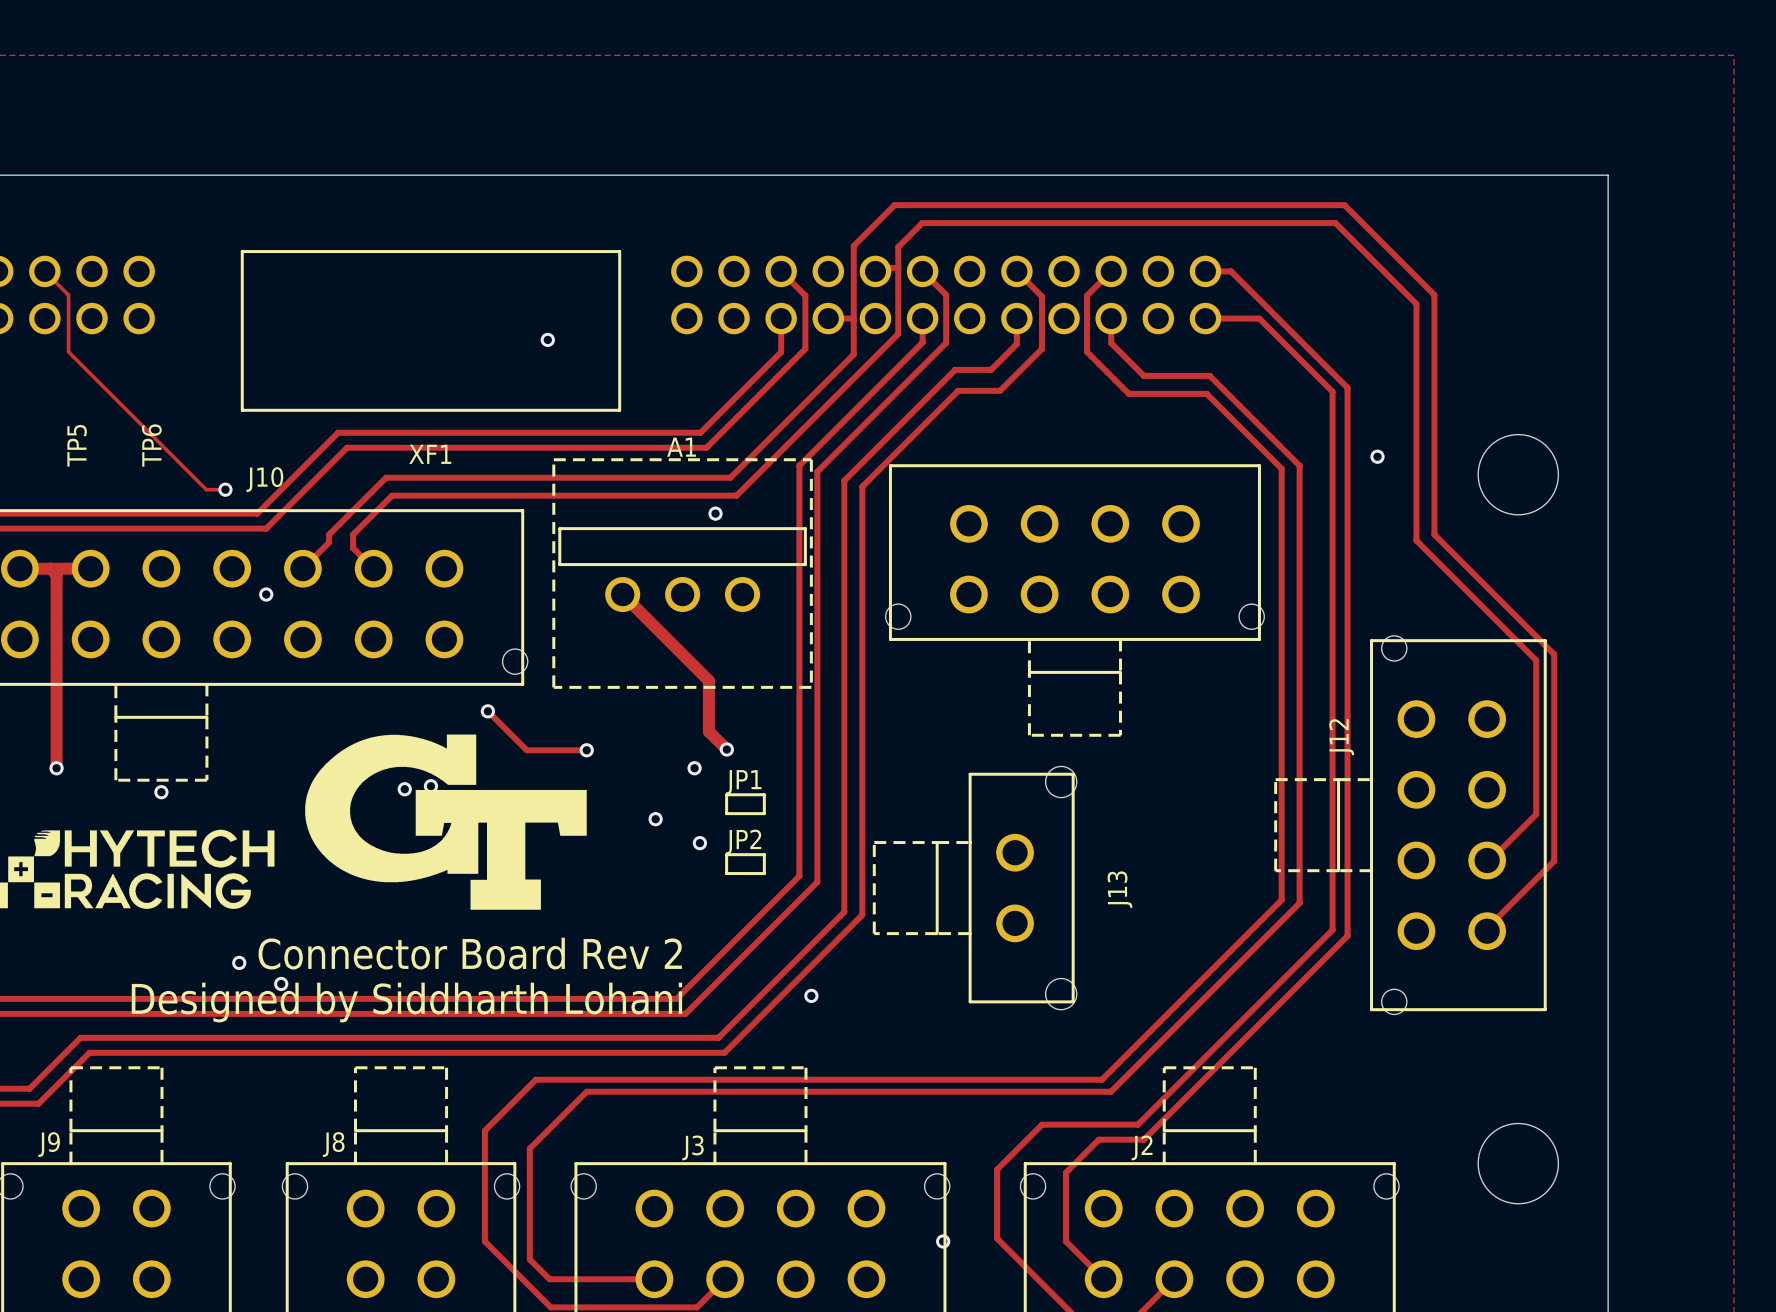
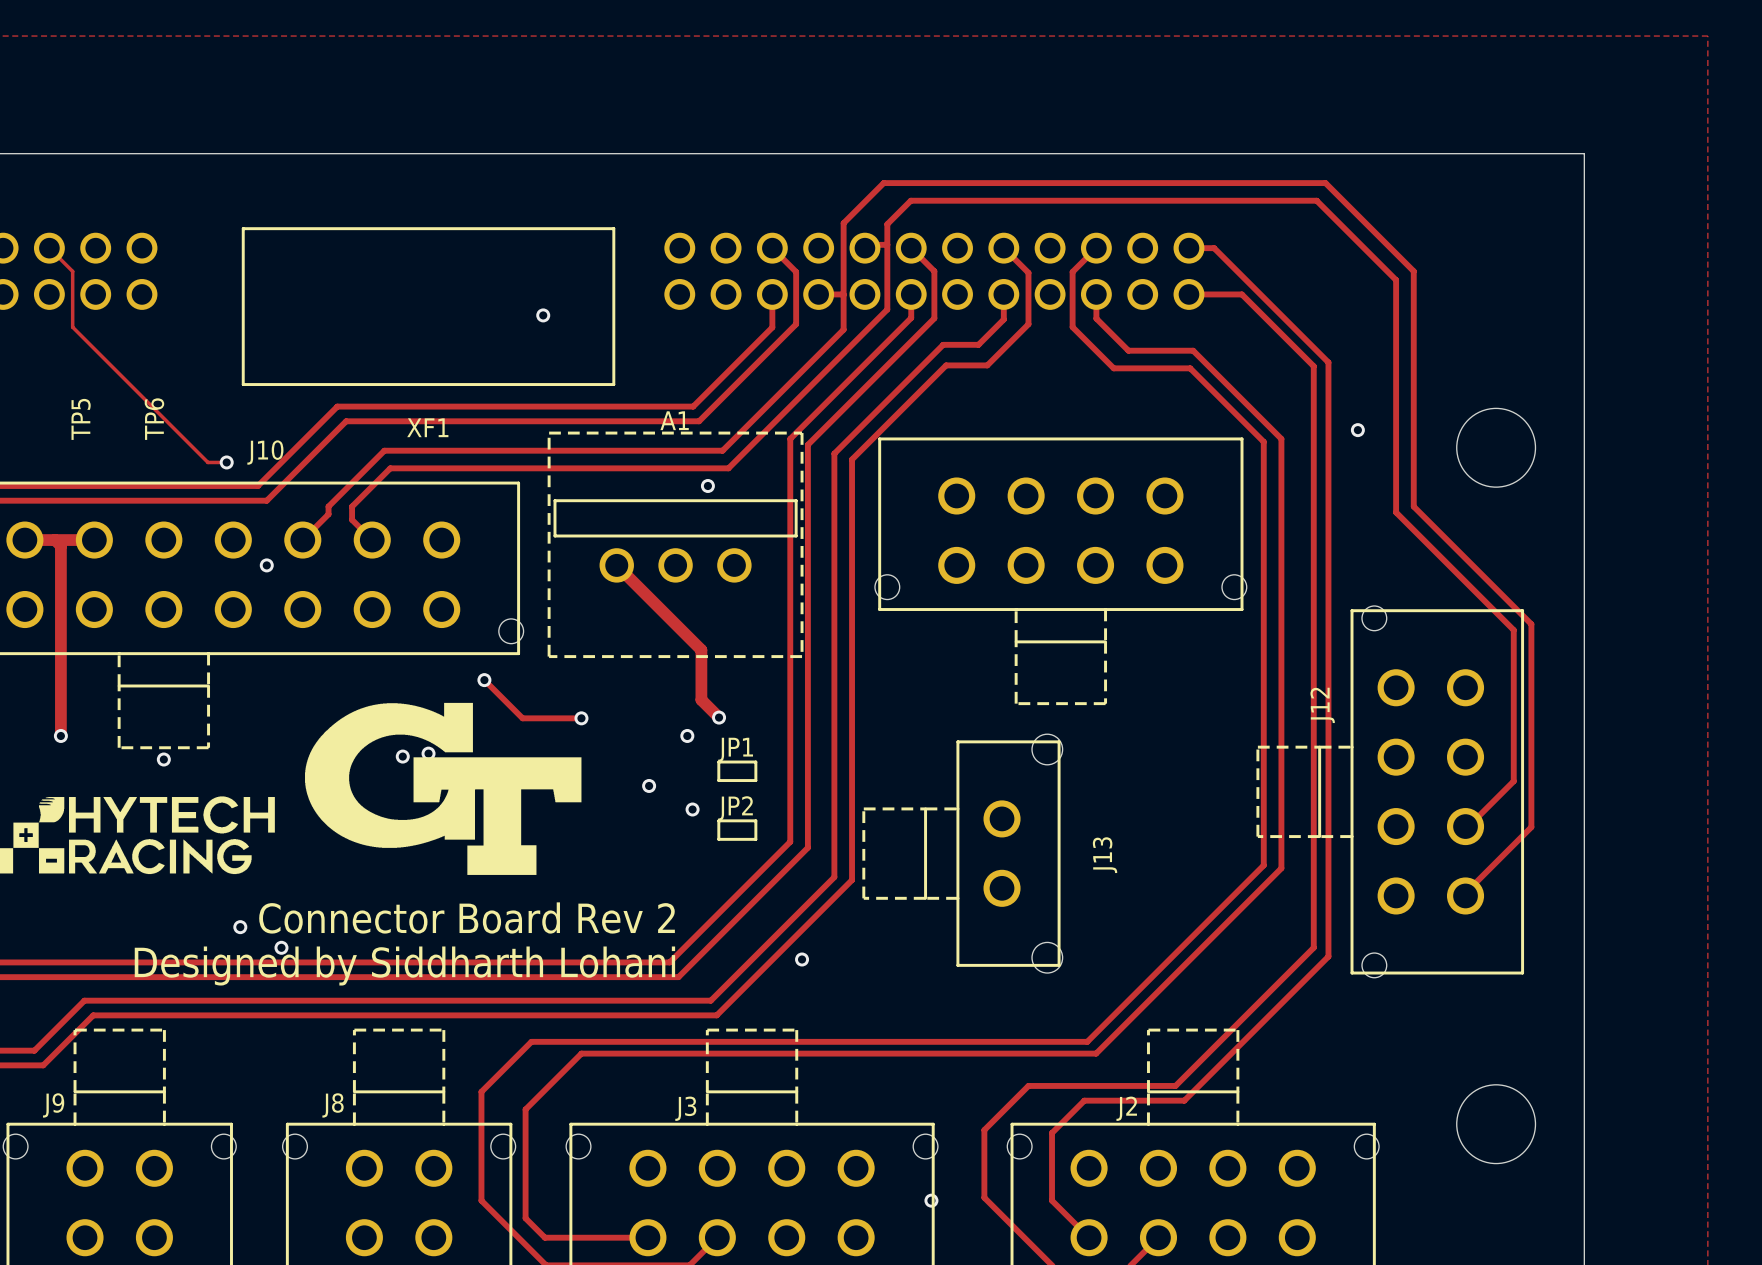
track: (1332, 929) (1137, 1124) -> (1313, 894) (1313, 947) (1175, 1085) (1122, 1085)
track: (1347, 935) (1143, 1139) -> (1328, 900) (1328, 956) (1184, 1100) (1128, 1100)

